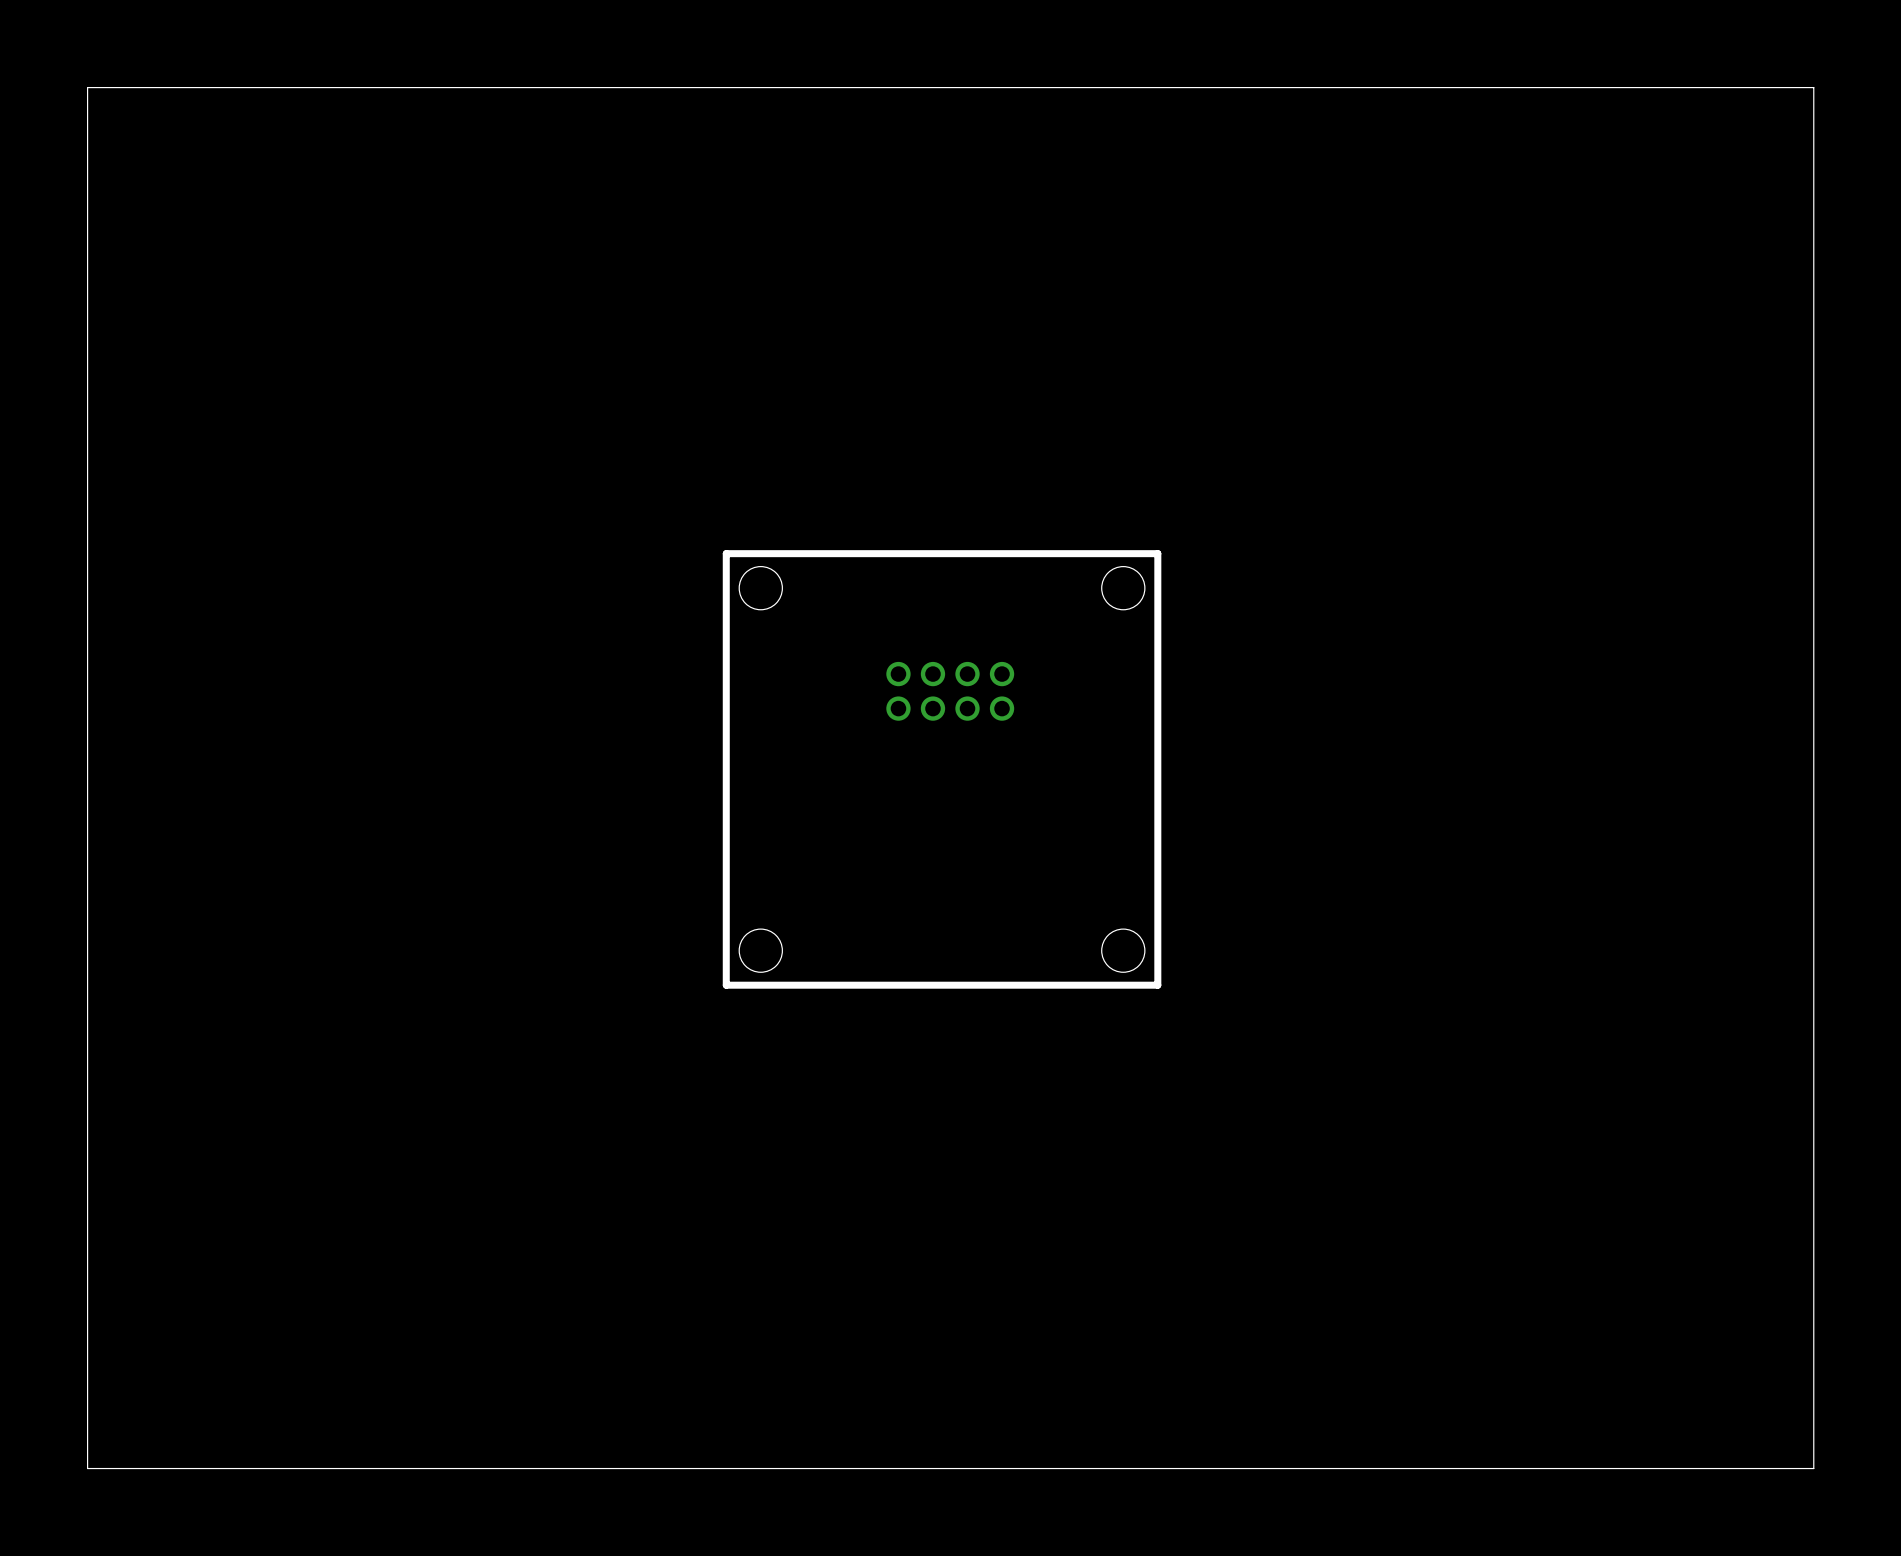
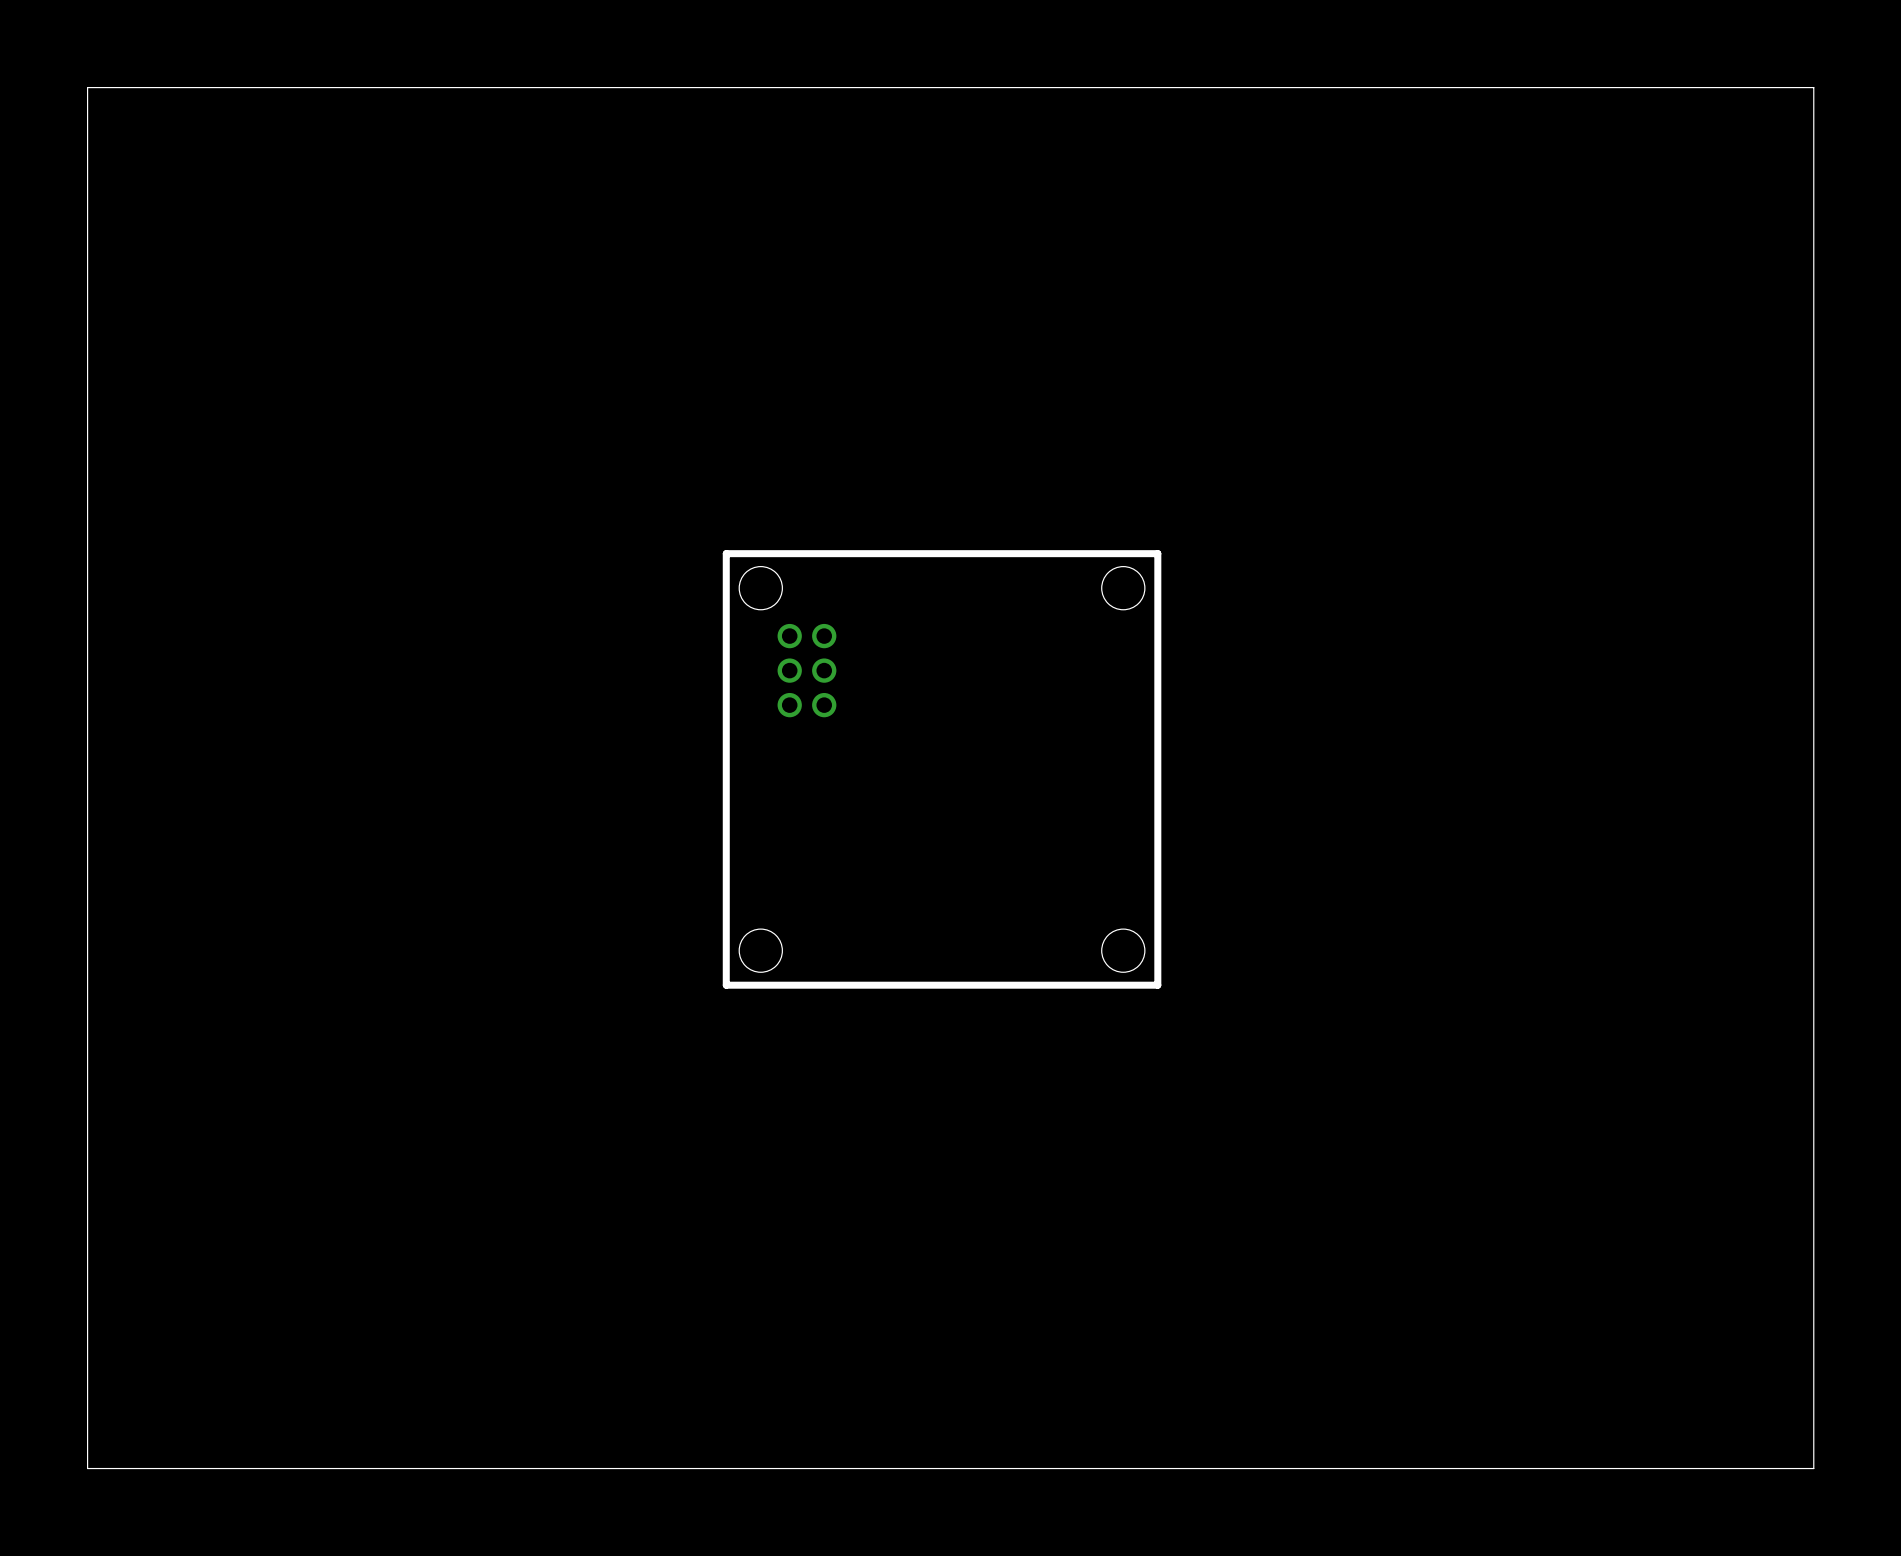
part: none -> (806, 670)
part: (950, 691) -> none

